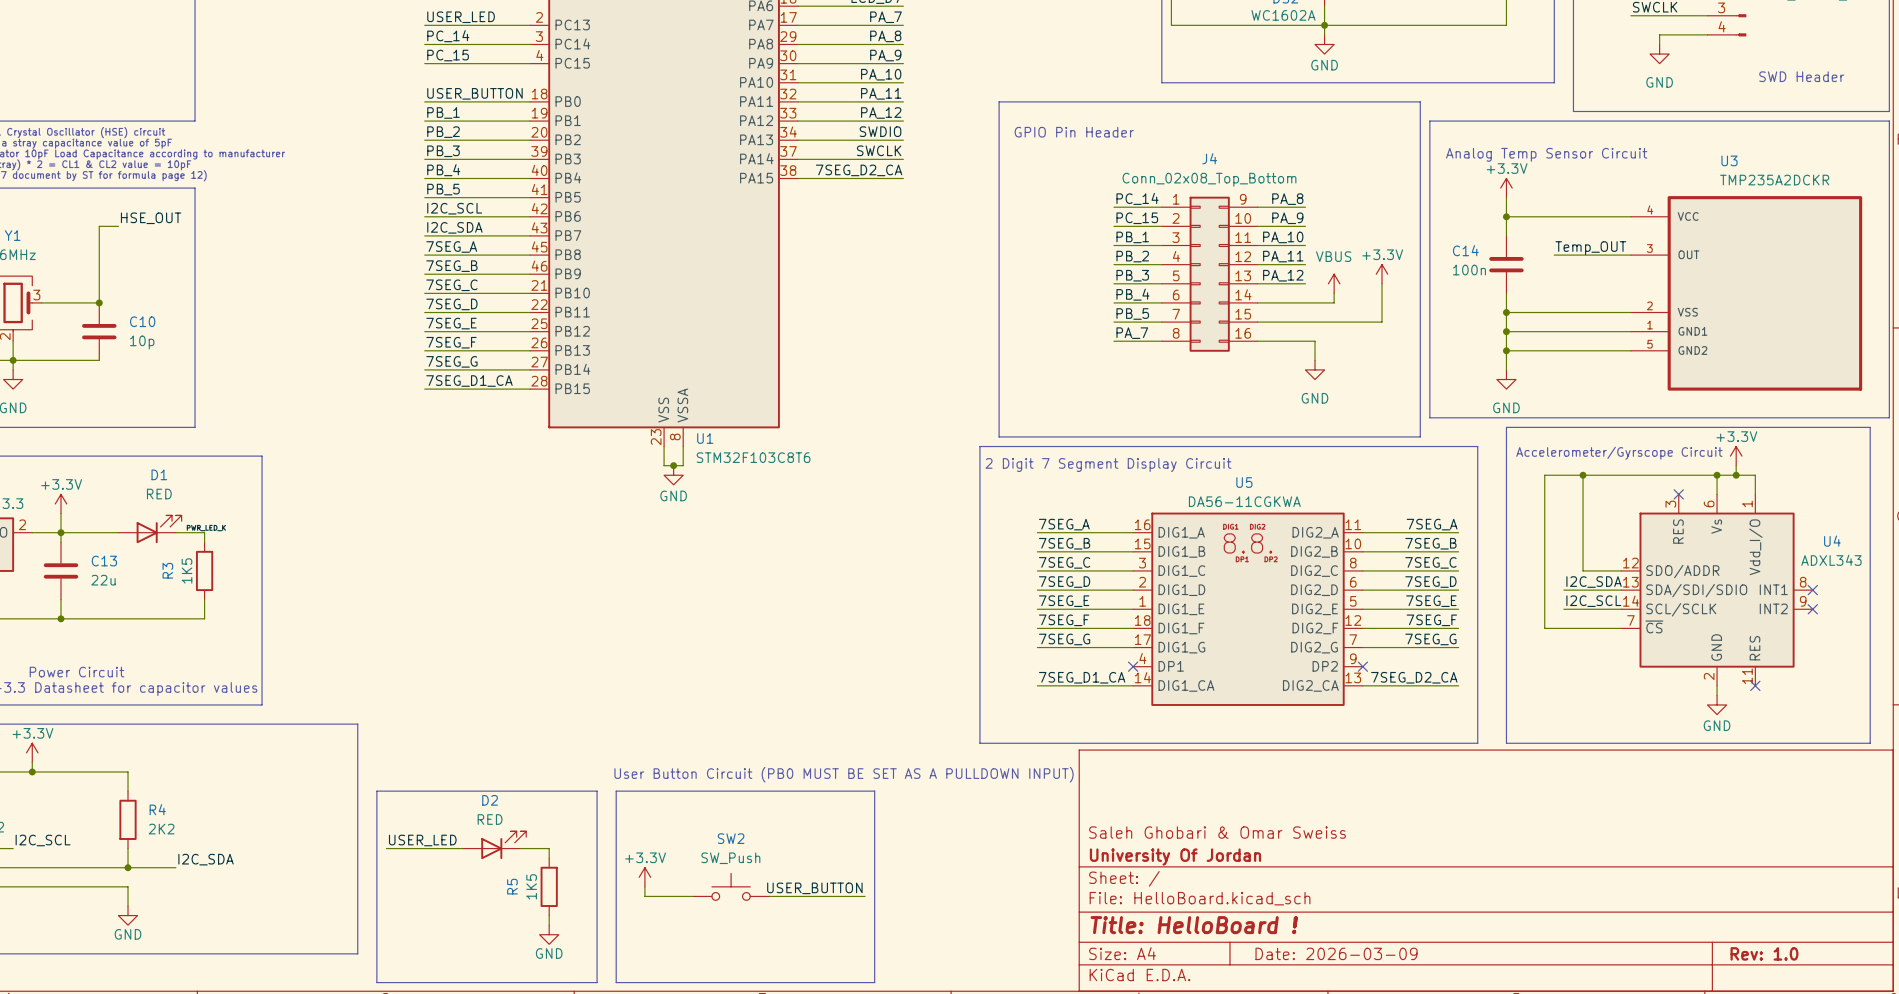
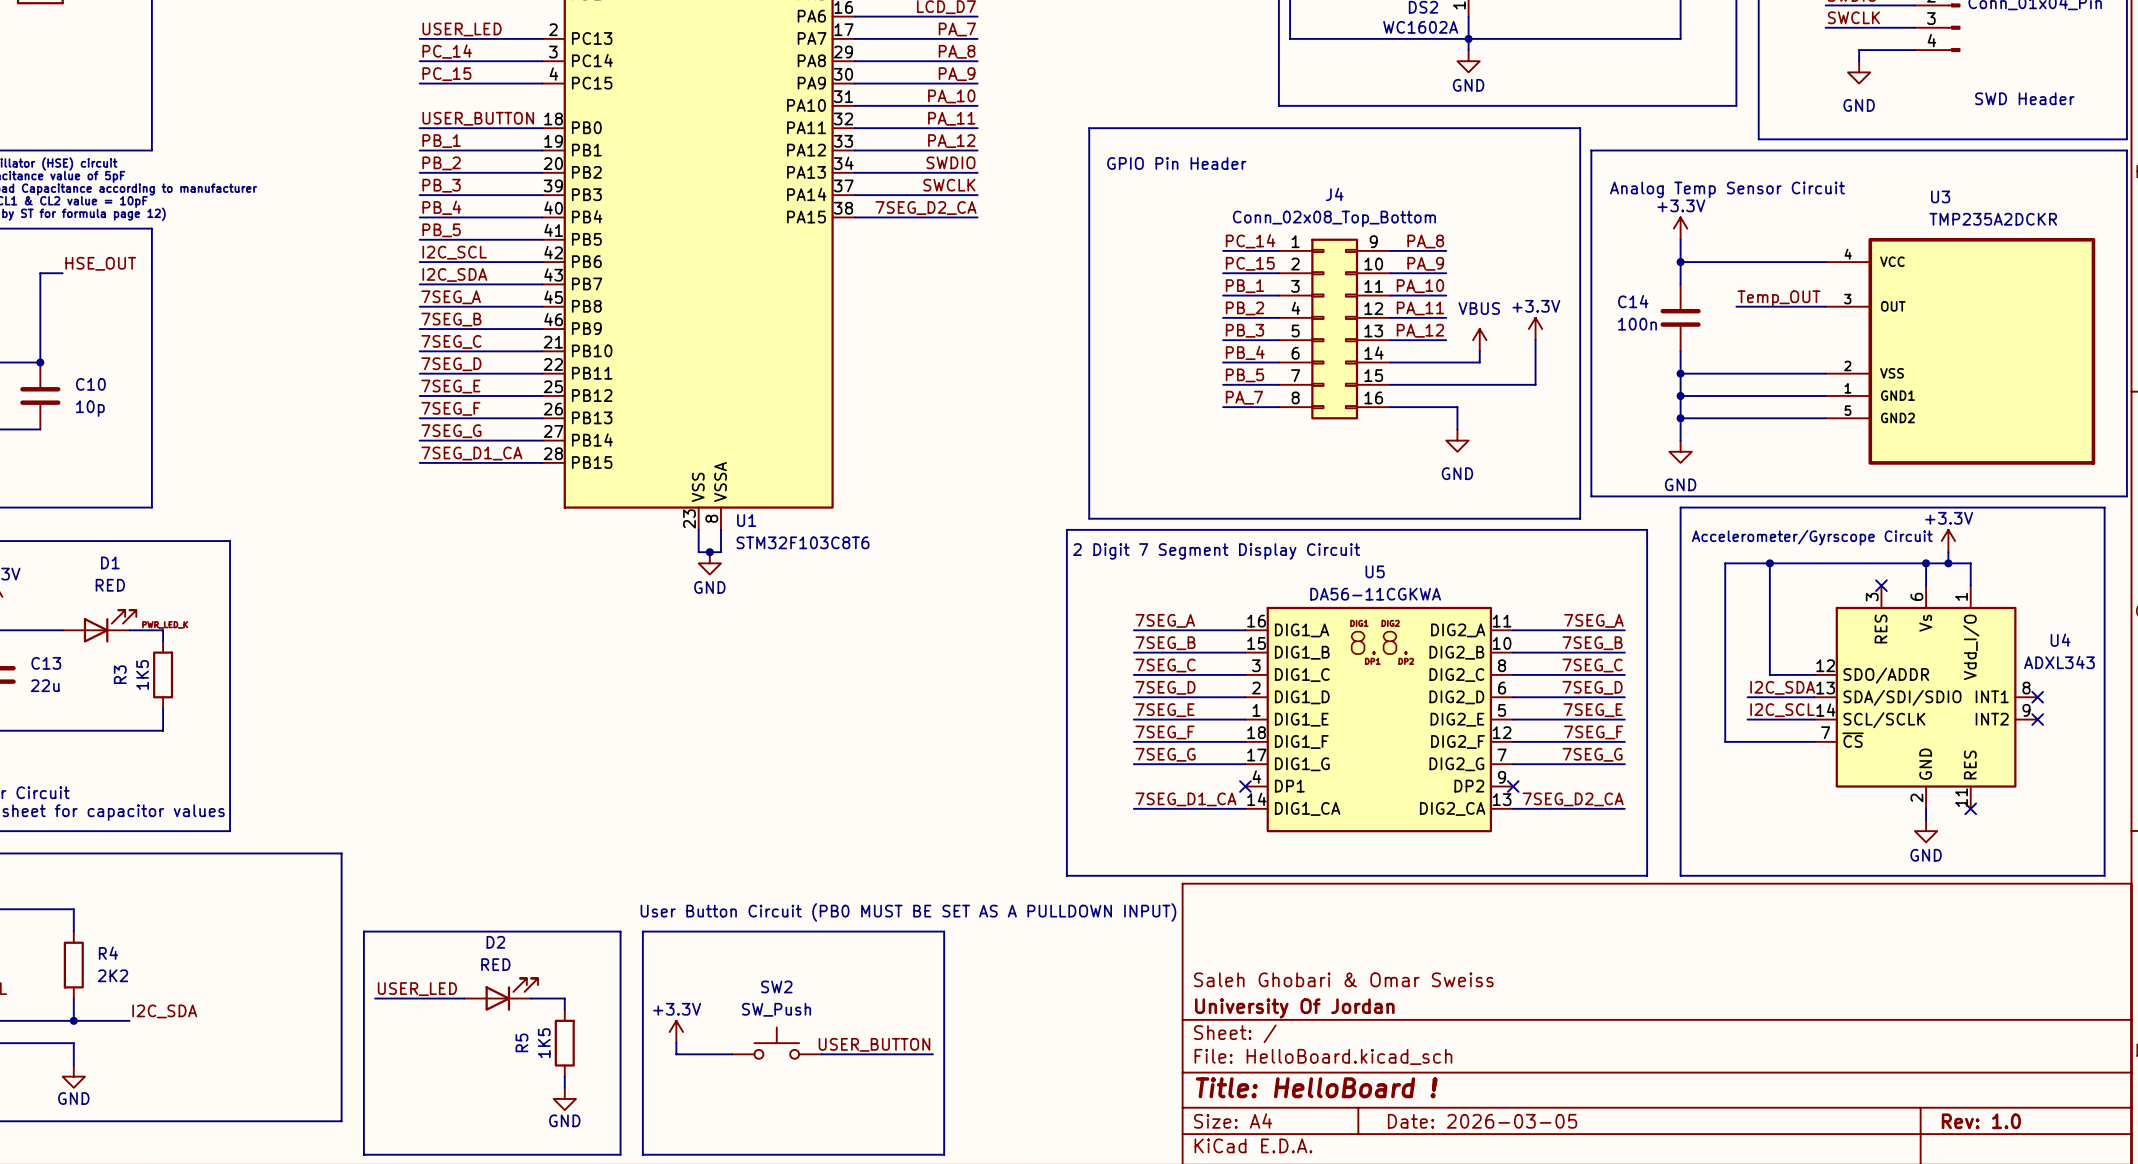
title block: Date: 2026-03-09 (1336, 953) -> Date: 2026-03-05 (1482, 1121)

